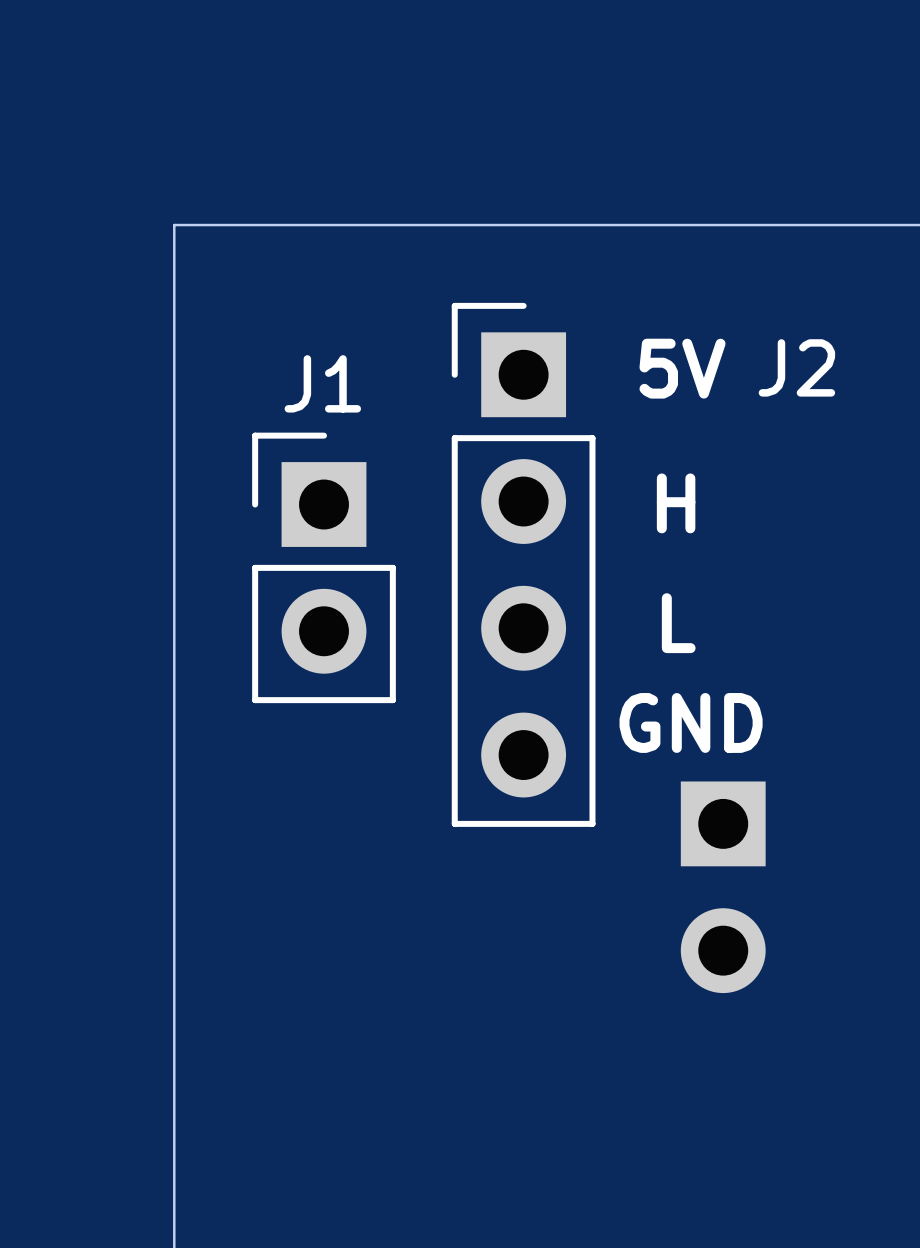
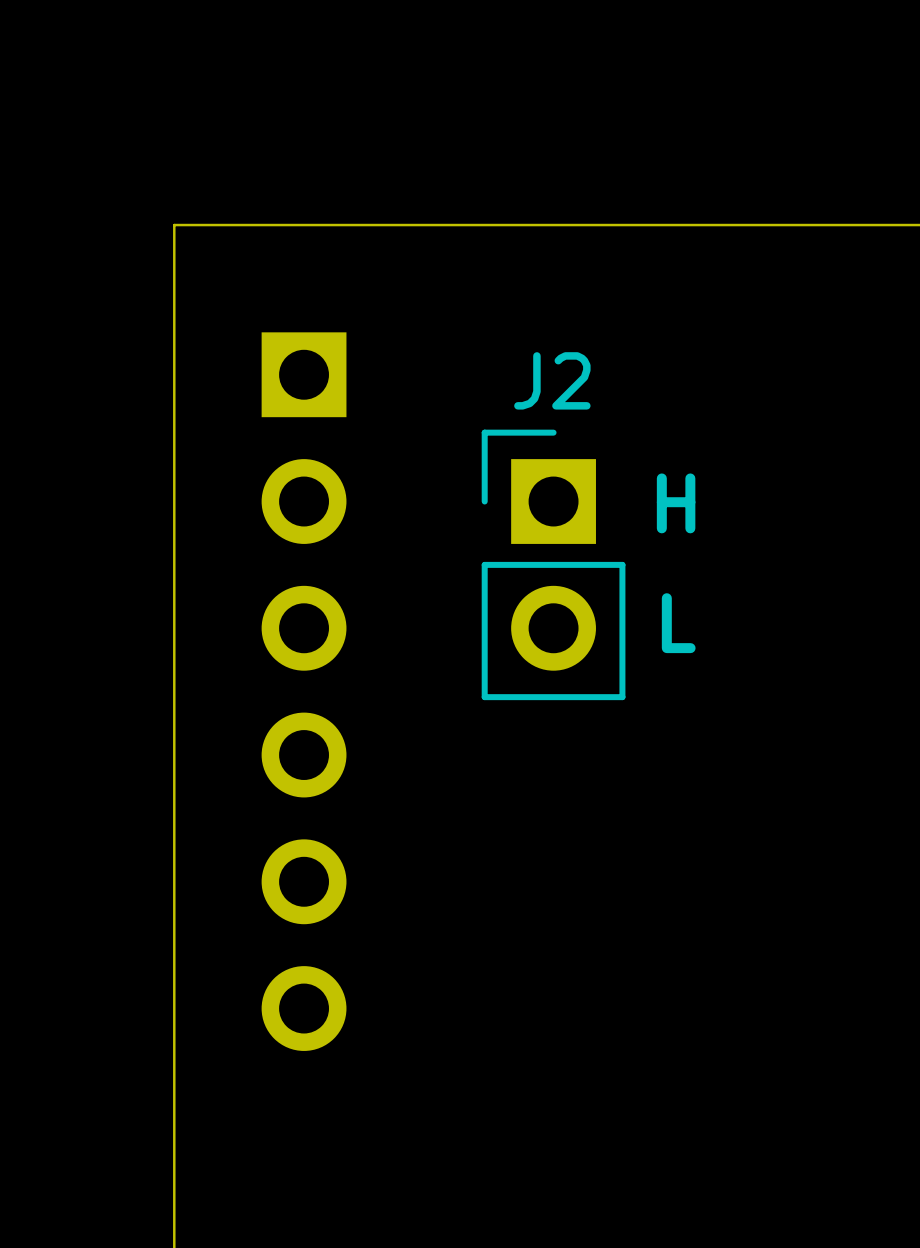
J2 footprint: [451, 302, 596, 827] -> [481, 429, 626, 701]
J2 name position: J2 (796, 367) -> J2 (552, 380)
text: 5V (682, 368) -> none
J1: (324, 567) -> none
part: none -> (304, 691)
text: GND (691, 722) -> none
part: (723, 887) -> none

